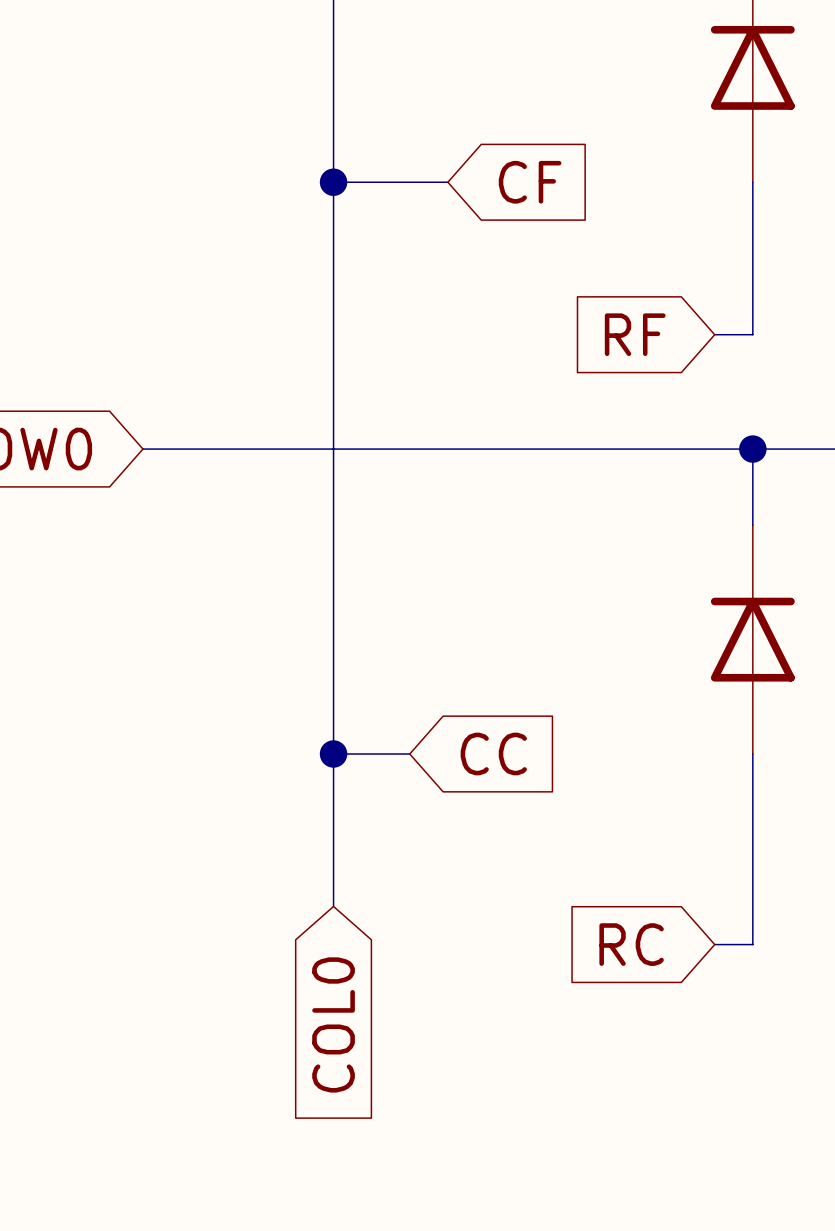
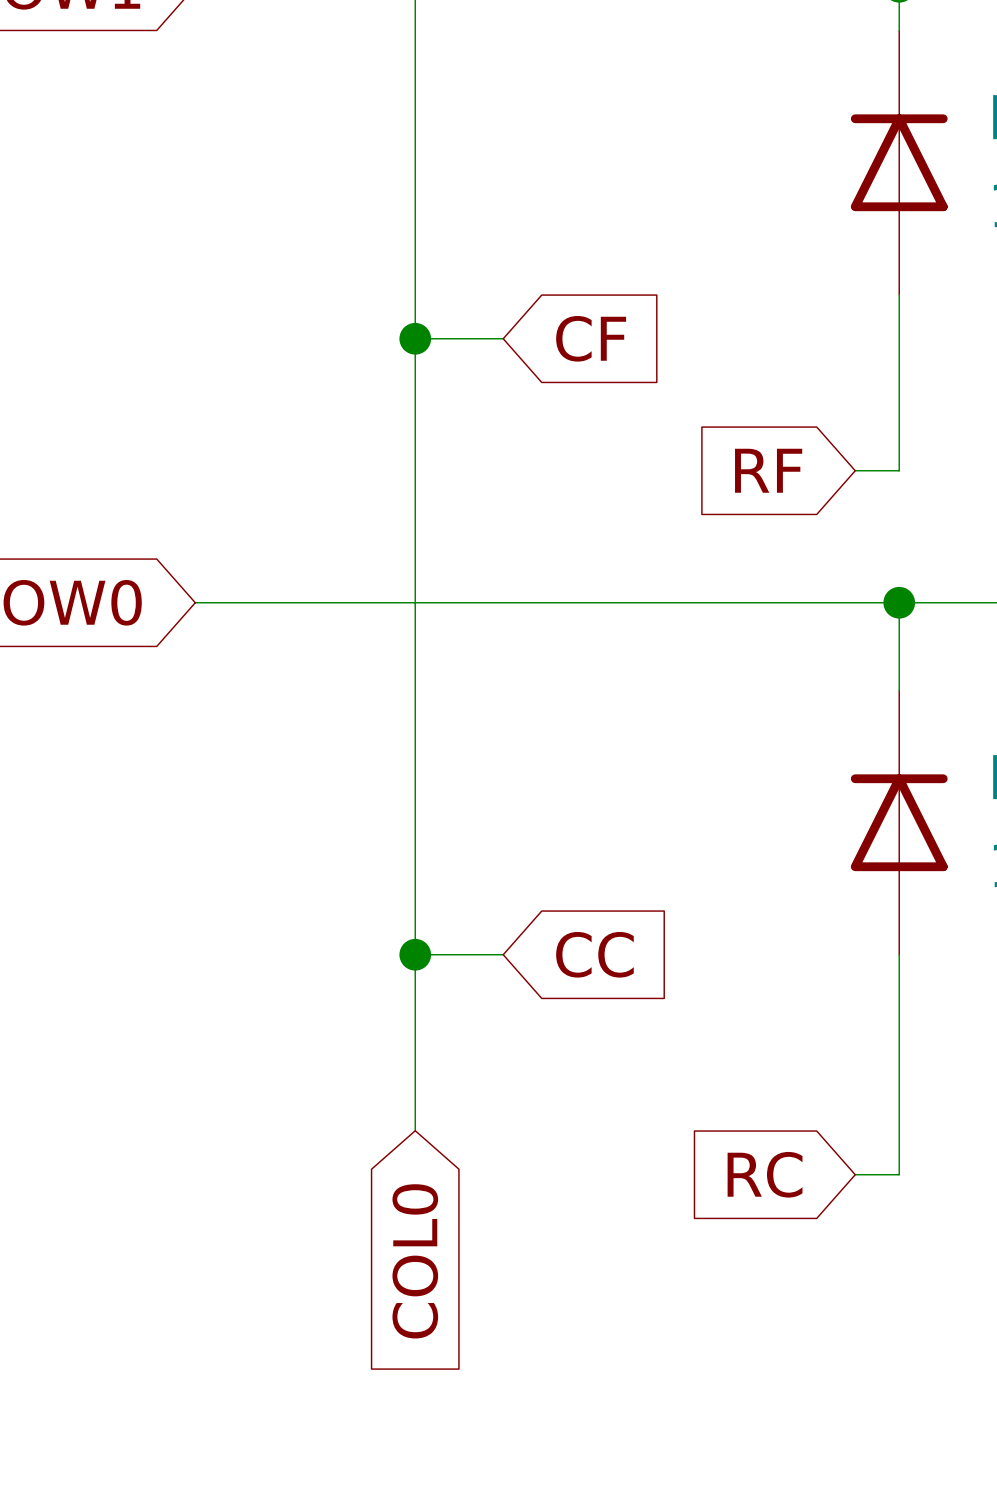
wire: (333, 182) (447, 182) -> none
junction position: (333, 182) -> (415, 338)
global label position: CF (530, 182) -> CF (591, 338)
wire: none -> (415, 338) (503, 338)

